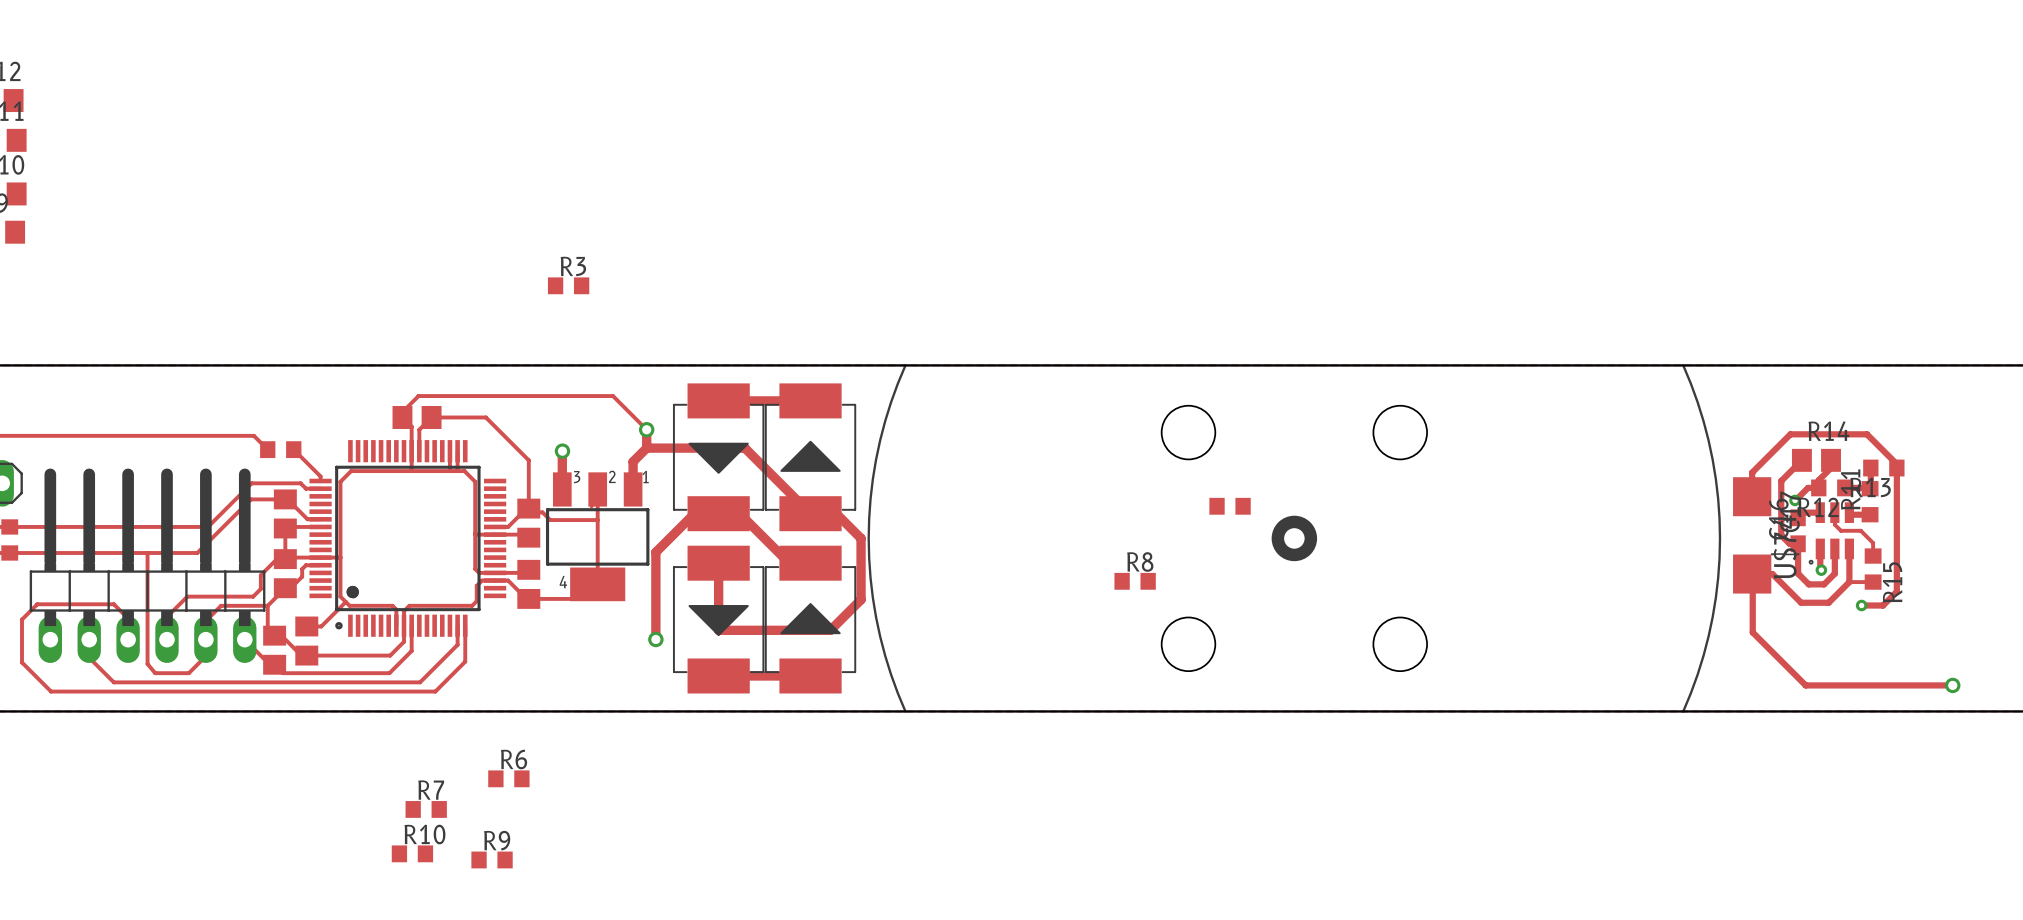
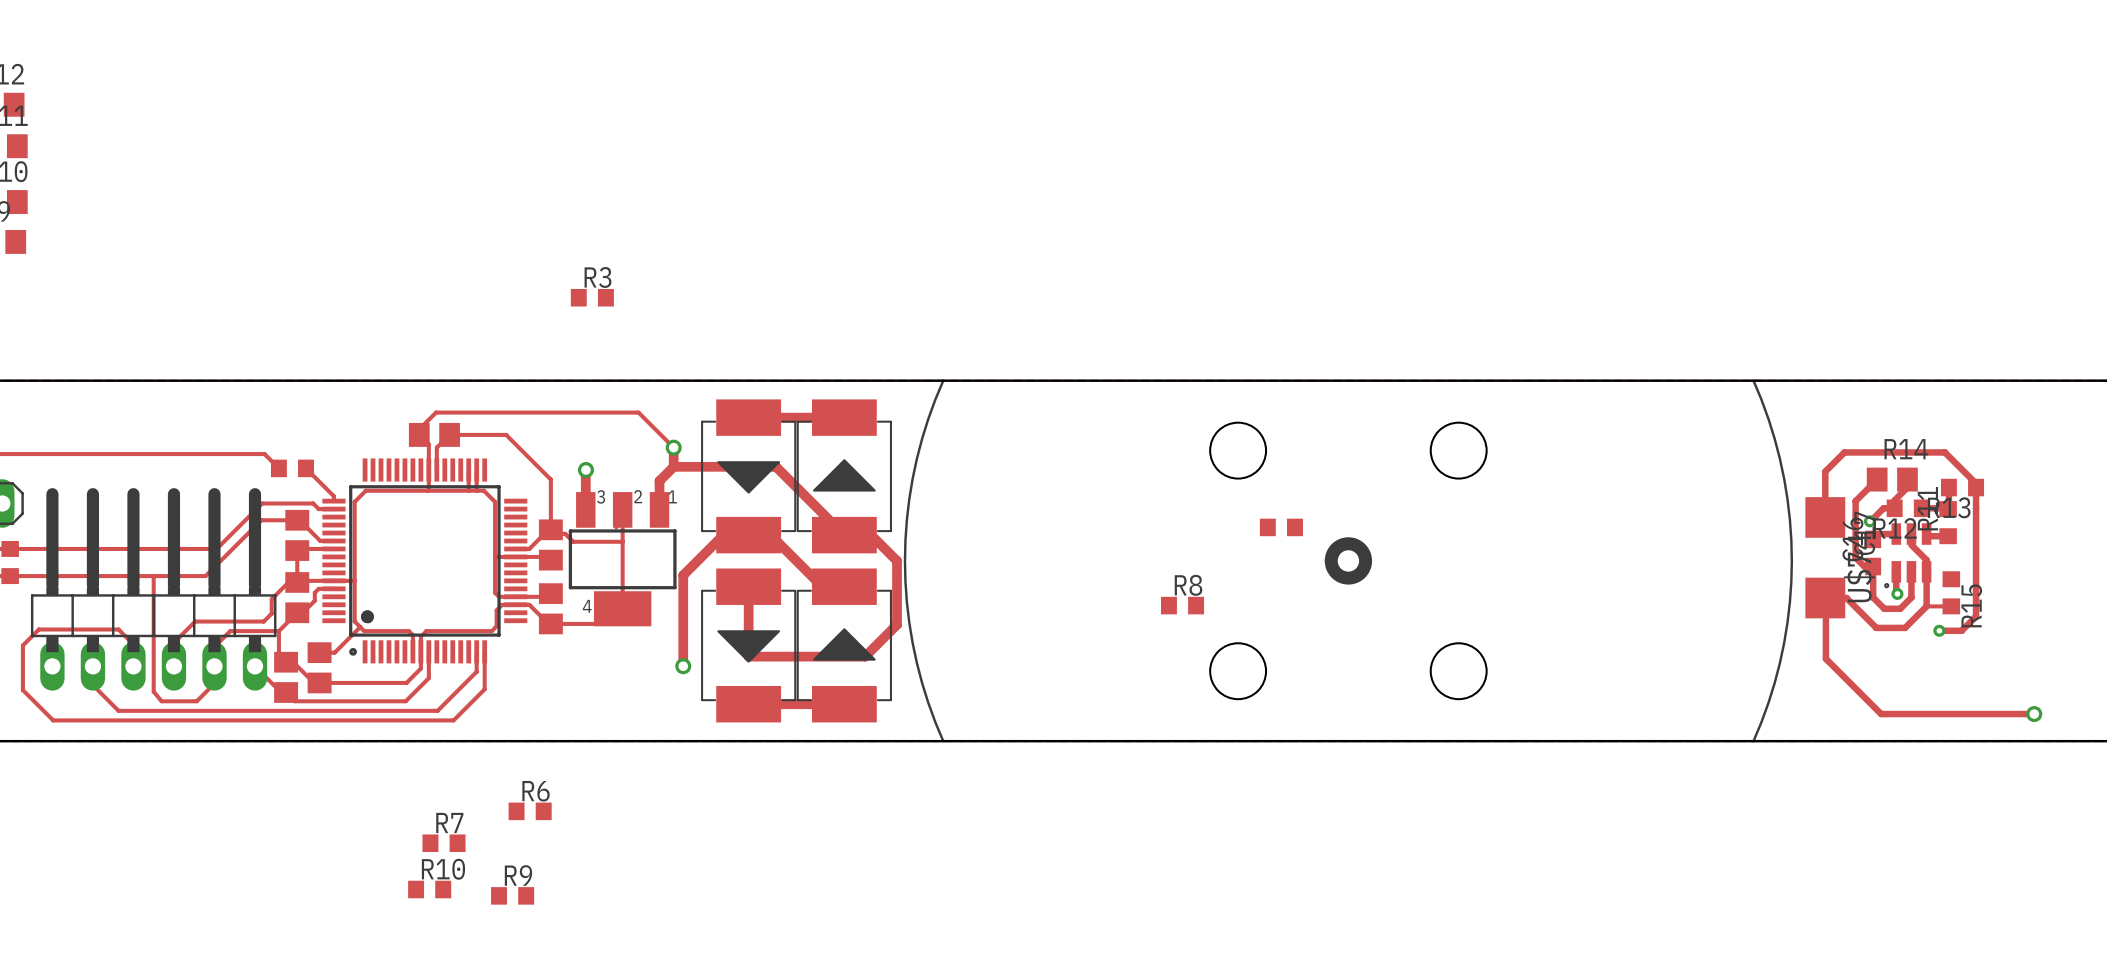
track: (1790, 434) (1752, 472) -> (1865, 452) (1844, 452) (1825, 471) (1825, 492)
track: (1834, 523) (1840, 530) (1860, 530) (1873, 543) (1873, 556) -> (1911, 544) (1926, 560) (1926, 571)

